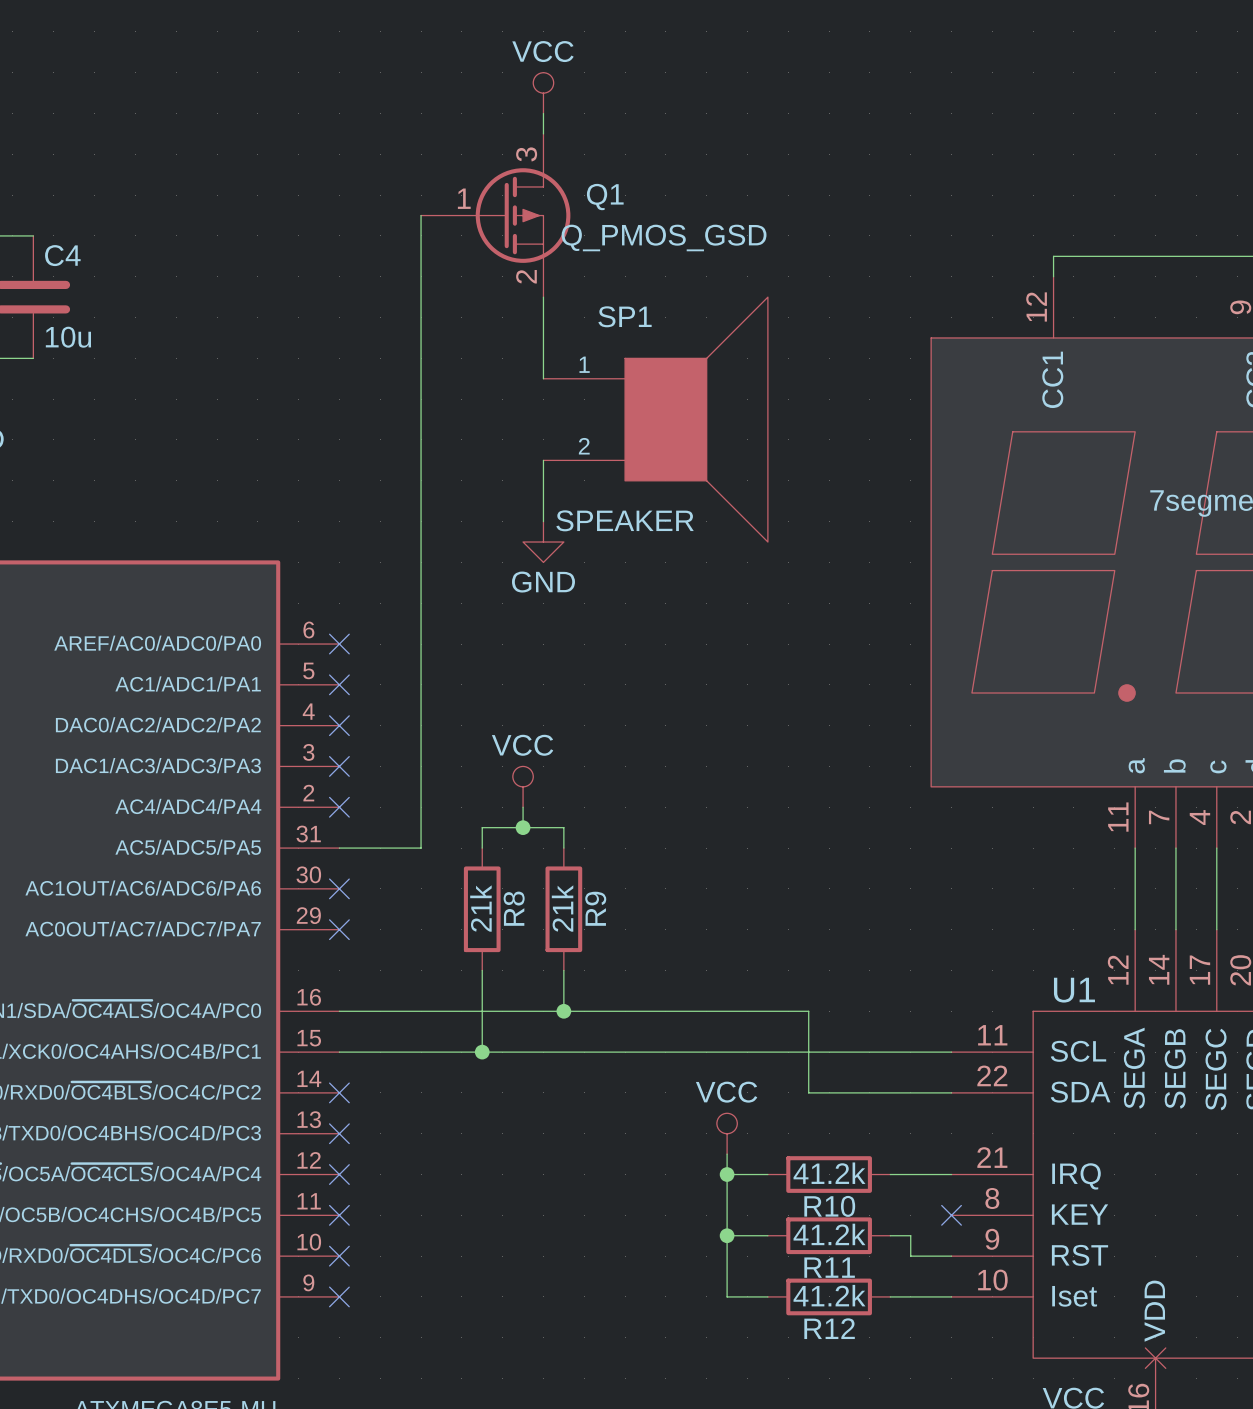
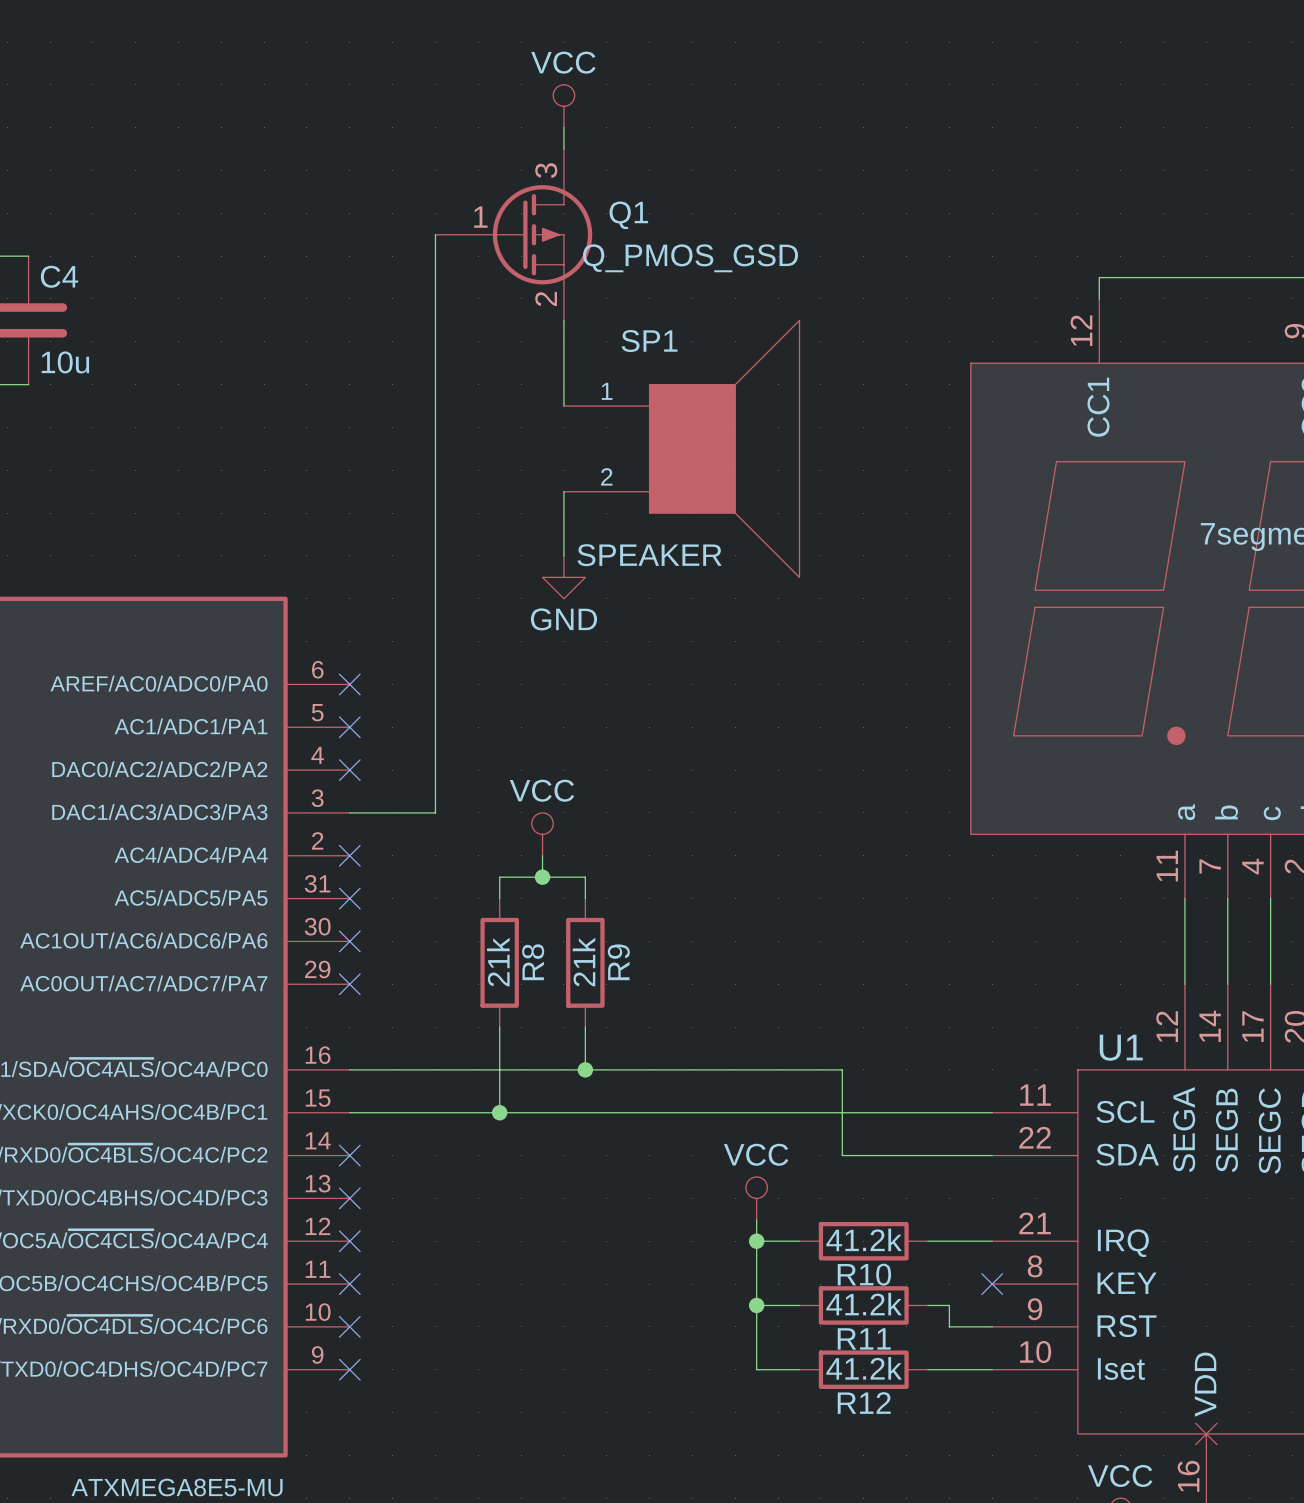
no-connect mark position: (339, 766) -> (349, 898)
wire: (421, 766) (421, 848) (339, 848) -> (435, 812) (349, 812)

